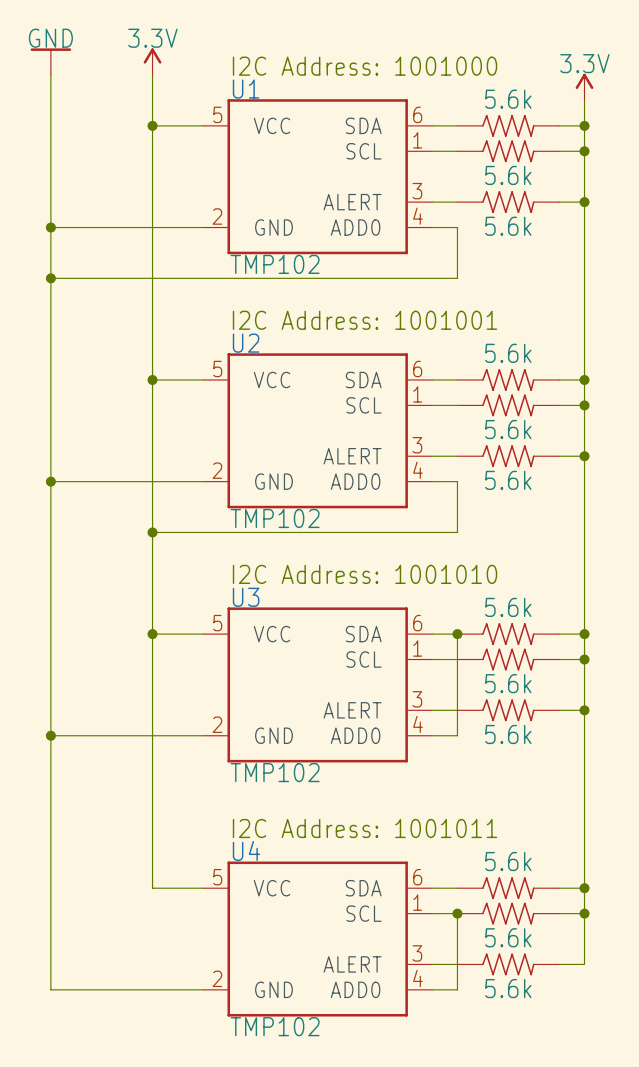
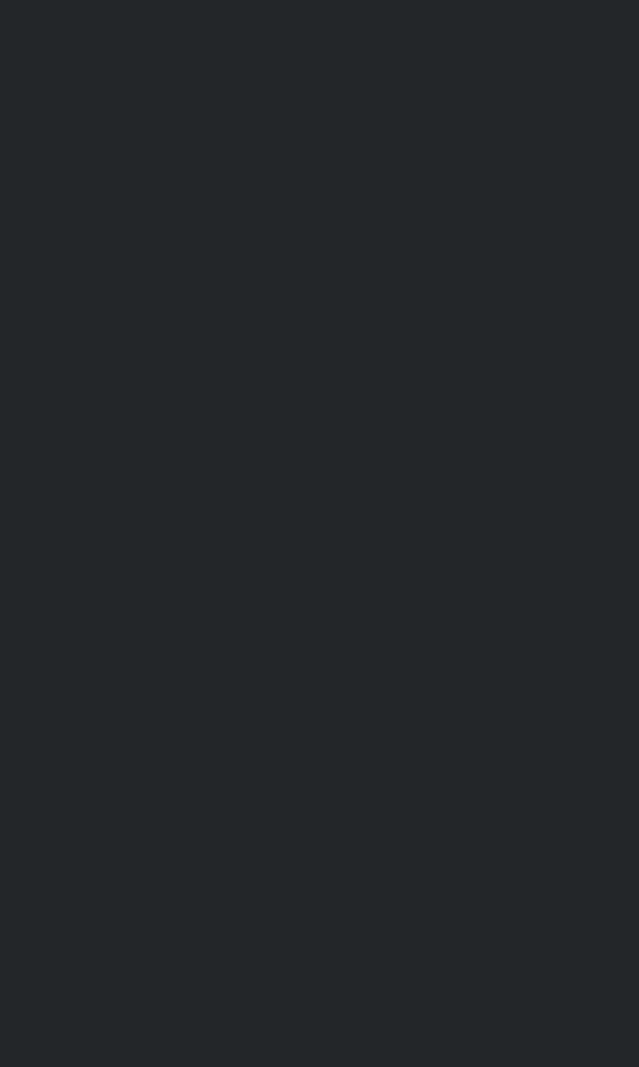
power symbol: GND (50, 61) -> none
power symbol: 3.3V (152, 61) -> none
text: I2C Address: 1001000 (365, 66) -> none
wire: (50, 75) (50, 989) (203, 989) -> none
wire: (152, 75) (152, 888) (203, 888) -> none
power symbol: 3.3V (584, 87) -> none
wire: (584, 100) (584, 964) (559, 964) -> none
wire: (152, 125) (203, 125) -> none
junction: (152, 125) -> none
wire: (432, 125) (457, 125) -> none
part: 5.6k (508, 125) -> none
wire: (559, 125) (584, 125) -> none
junction: (584, 125) -> none
wire: (432, 151) (457, 151) -> none
part: 5.6k (508, 151) -> none
wire: (559, 151) (584, 151) -> none
junction: (584, 151) -> none
U1: TMP102 (317, 176) -> none
wire: (432, 202) (457, 202) -> none
part: 5.6k (508, 202) -> none
wire: (559, 202) (584, 202) -> none
junction: (584, 202) -> none
wire: (50, 227) (203, 227) -> none
junction: (50, 227) -> none
wire: (432, 227) (457, 227) (457, 278) (50, 278) -> none
junction: (50, 278) -> none
text: I2C Address: 1001001 (365, 320) -> none
wire: (152, 379) (203, 379) -> none
junction: (152, 379) -> none
wire: (432, 379) (457, 379) -> none
part: 5.6k (508, 379) -> none
wire: (559, 379) (584, 379) -> none
junction: (584, 379) -> none
wire: (432, 405) (457, 405) -> none
part: 5.6k (508, 405) -> none
wire: (559, 405) (584, 405) -> none
junction: (584, 405) -> none
U2: TMP102 (317, 430) -> none
wire: (432, 456) (457, 456) -> none
part: 5.6k (508, 456) -> none
wire: (559, 456) (584, 456) -> none
junction: (584, 456) -> none
wire: (50, 481) (203, 481) -> none
junction: (50, 481) -> none
wire: (432, 481) (457, 481) (457, 532) (152, 532) -> none
junction: (152, 532) -> none
text: I2C Address: 1001010 (365, 574) -> none
wire: (152, 634) (203, 634) -> none
junction: (152, 634) -> none
wire: (432, 634) (457, 634) (457, 735) (432, 735) -> none
junction: (457, 634) -> none
part: 5.6k (508, 634) -> none
wire: (559, 634) (584, 634) -> none
junction: (584, 634) -> none
wire: (432, 659) (457, 659) -> none
part: 5.6k (508, 659) -> none
wire: (559, 659) (584, 659) -> none
junction: (584, 659) -> none
U3: TMP102 (317, 684) -> none
wire: (432, 710) (457, 710) -> none
part: 5.6k (508, 710) -> none
wire: (559, 710) (584, 710) -> none
junction: (584, 710) -> none
wire: (50, 735) (203, 735) -> none
junction: (50, 735) -> none
text: I2C Address: 1001011 (365, 828) -> none
wire: (432, 888) (457, 888) -> none
part: 5.6k (508, 888) -> none
wire: (559, 888) (584, 888) -> none
junction: (584, 888) -> none
wire: (432, 913) (457, 913) (457, 989) (432, 989) -> none
junction: (457, 913) -> none
part: 5.6k (508, 913) -> none
wire: (559, 913) (584, 913) -> none
junction: (584, 913) -> none
U4: TMP102 (317, 939) -> none
wire: (432, 964) (457, 964) -> none
part: 5.6k (508, 964) -> none

